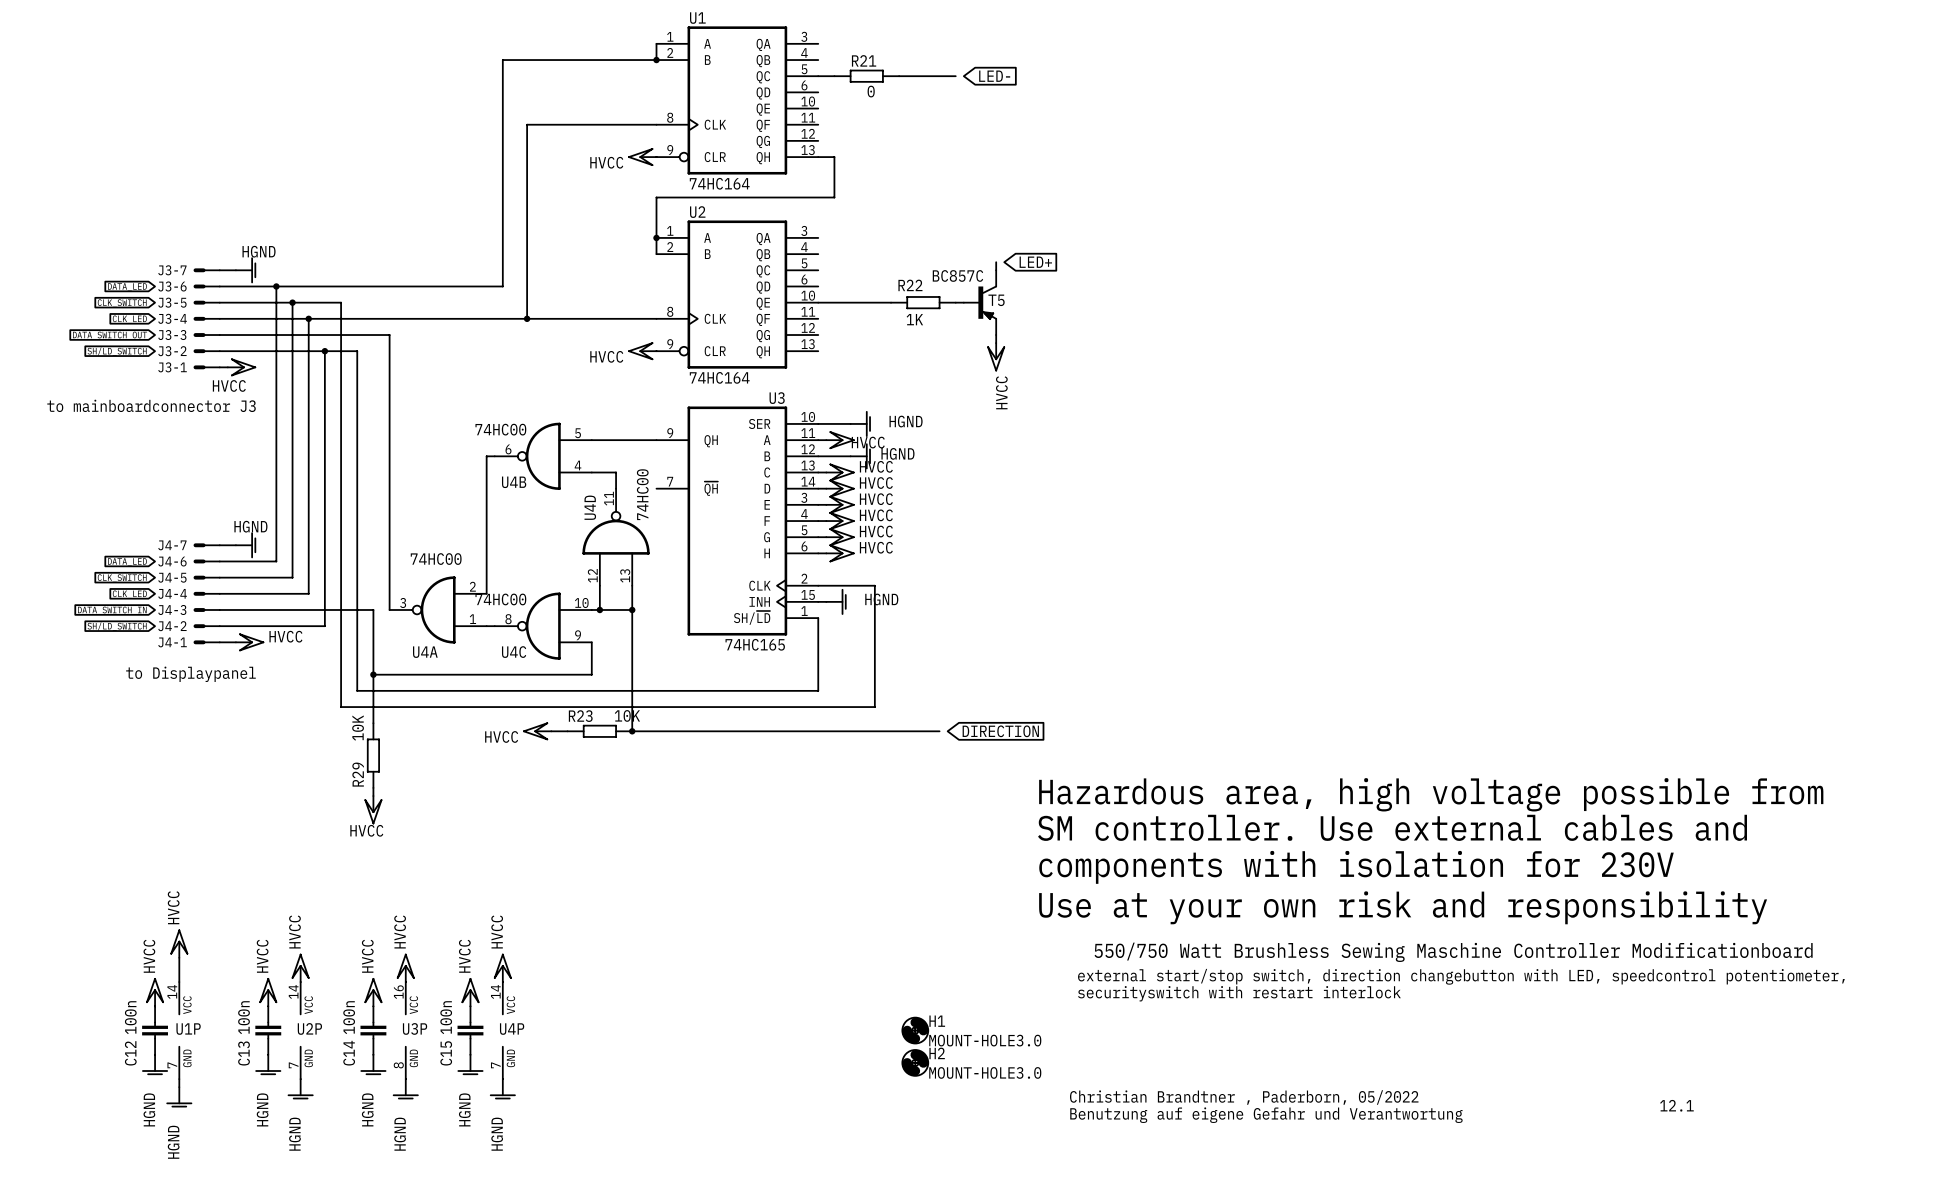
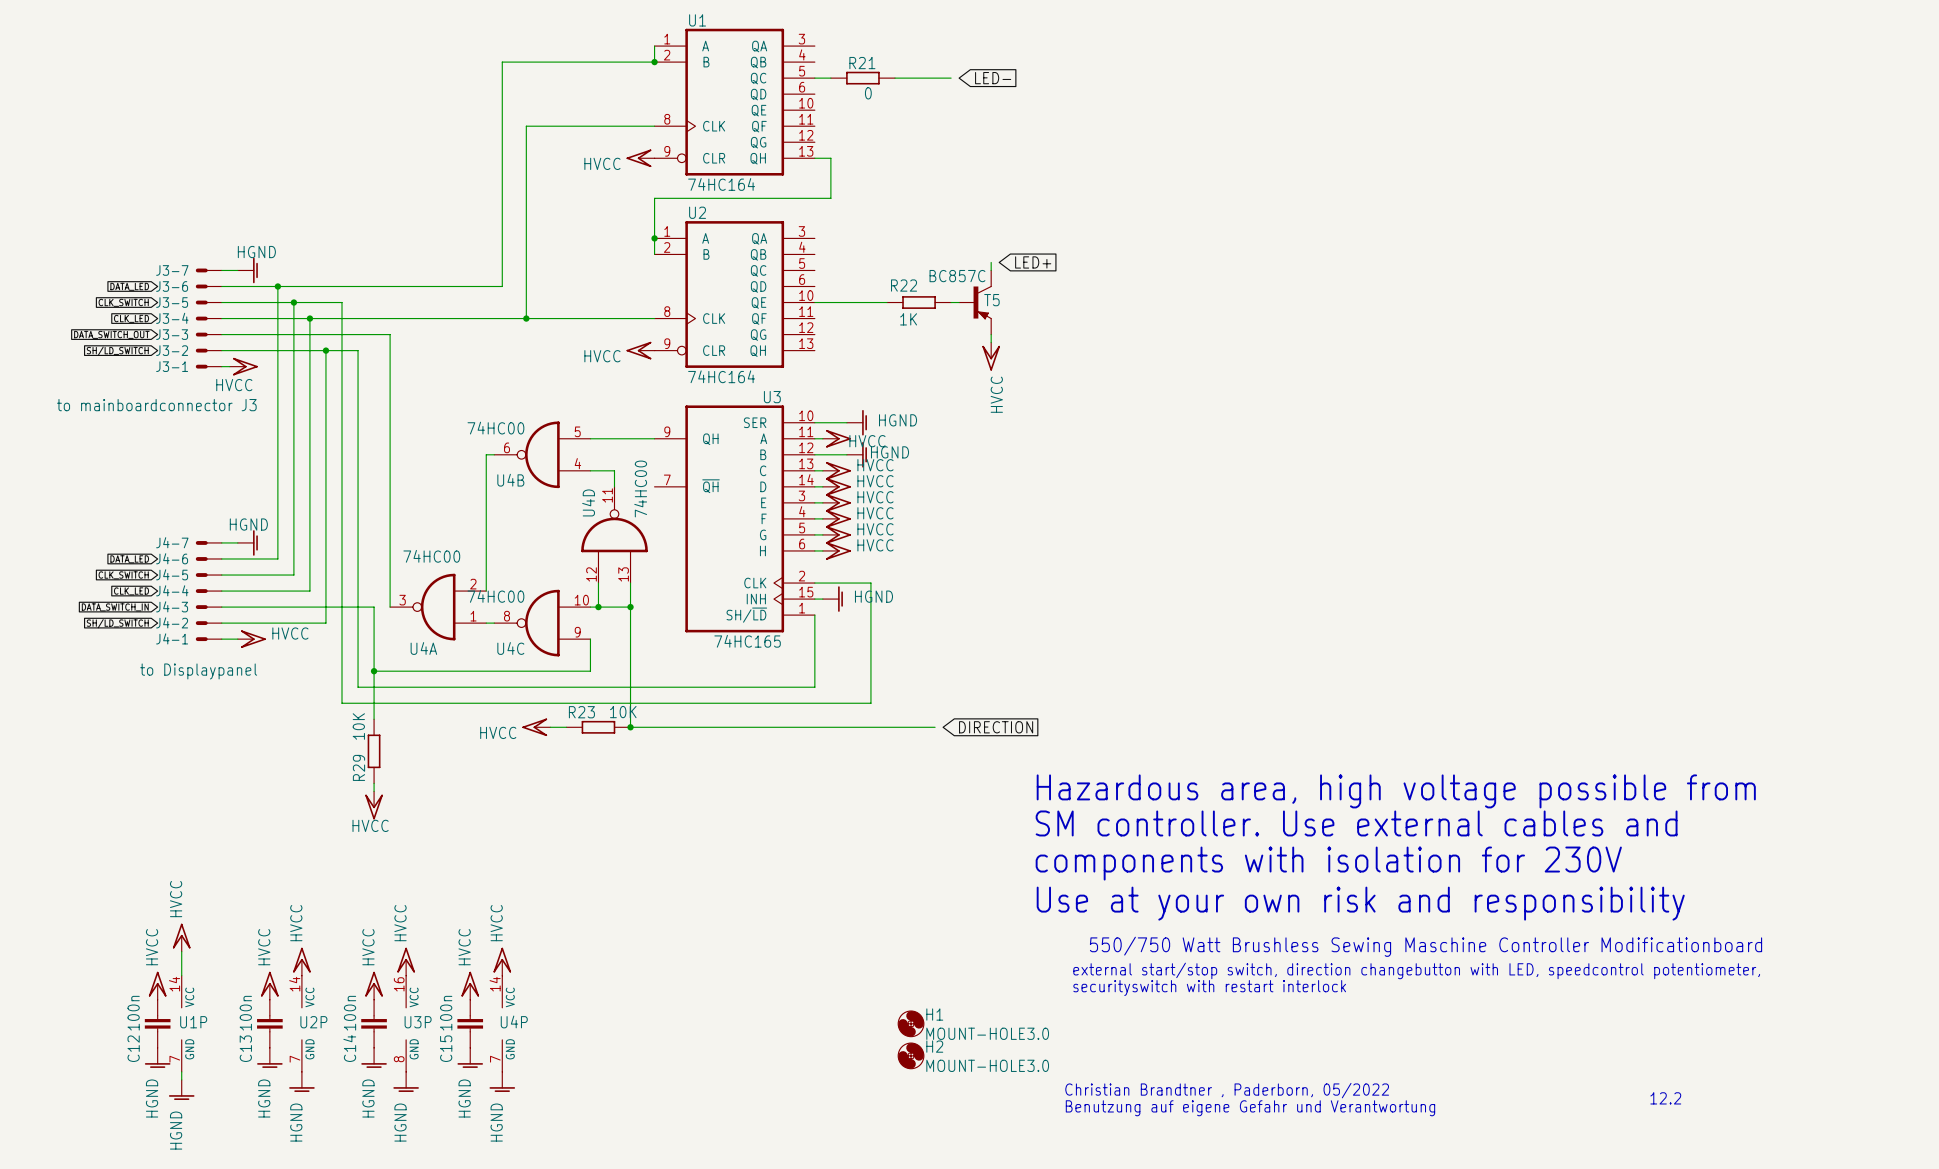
text: 12.1 (1676, 1105) -> 12.2 (1665, 1098)

